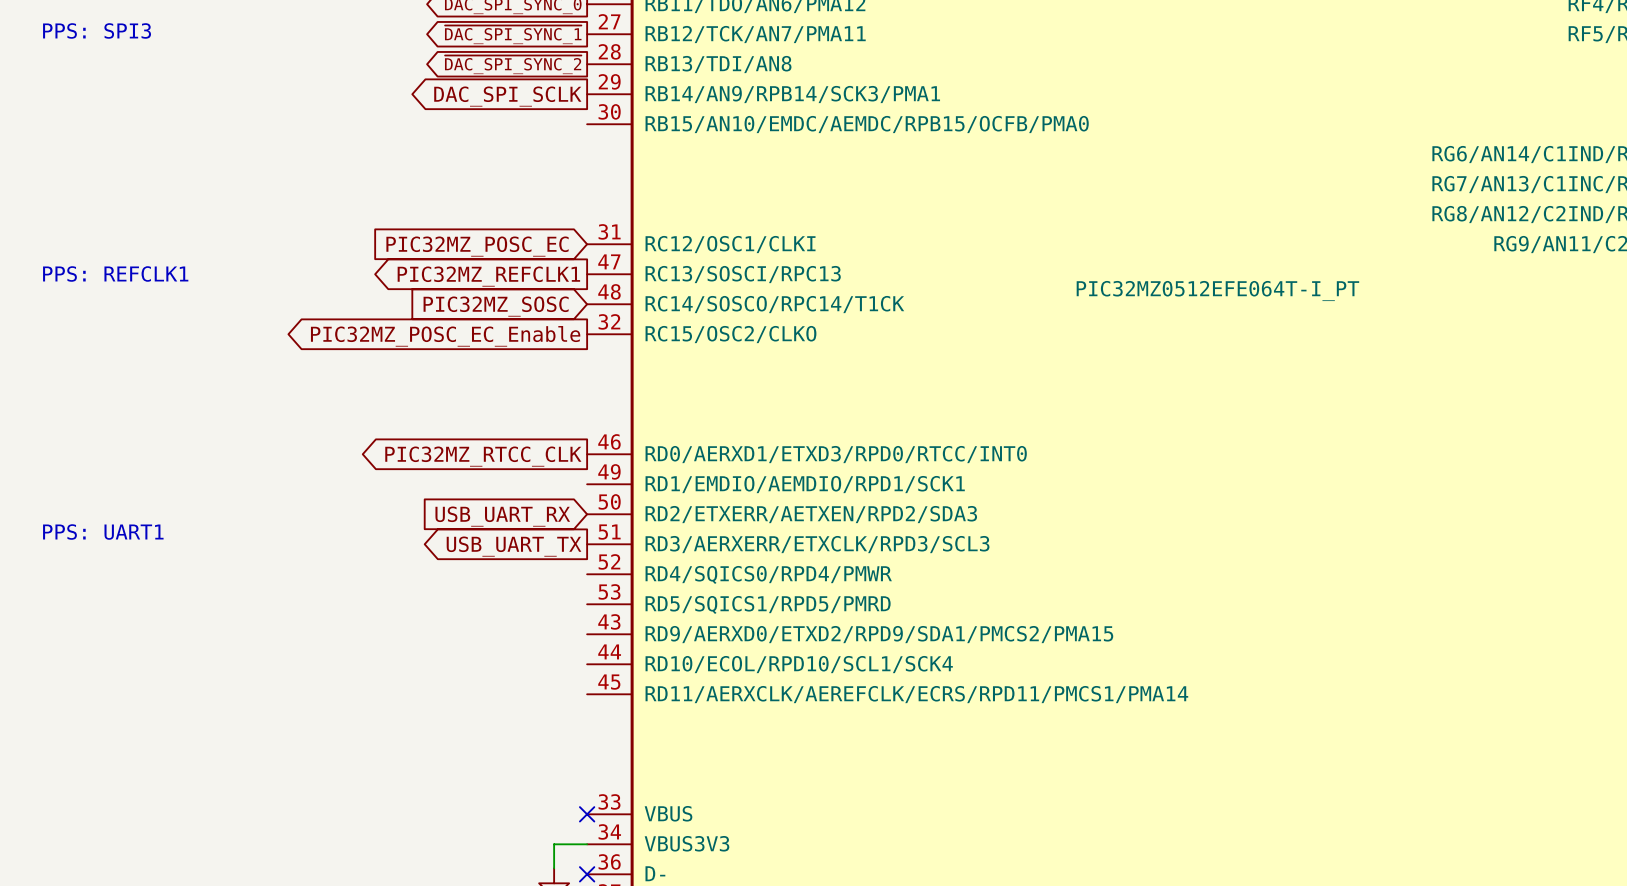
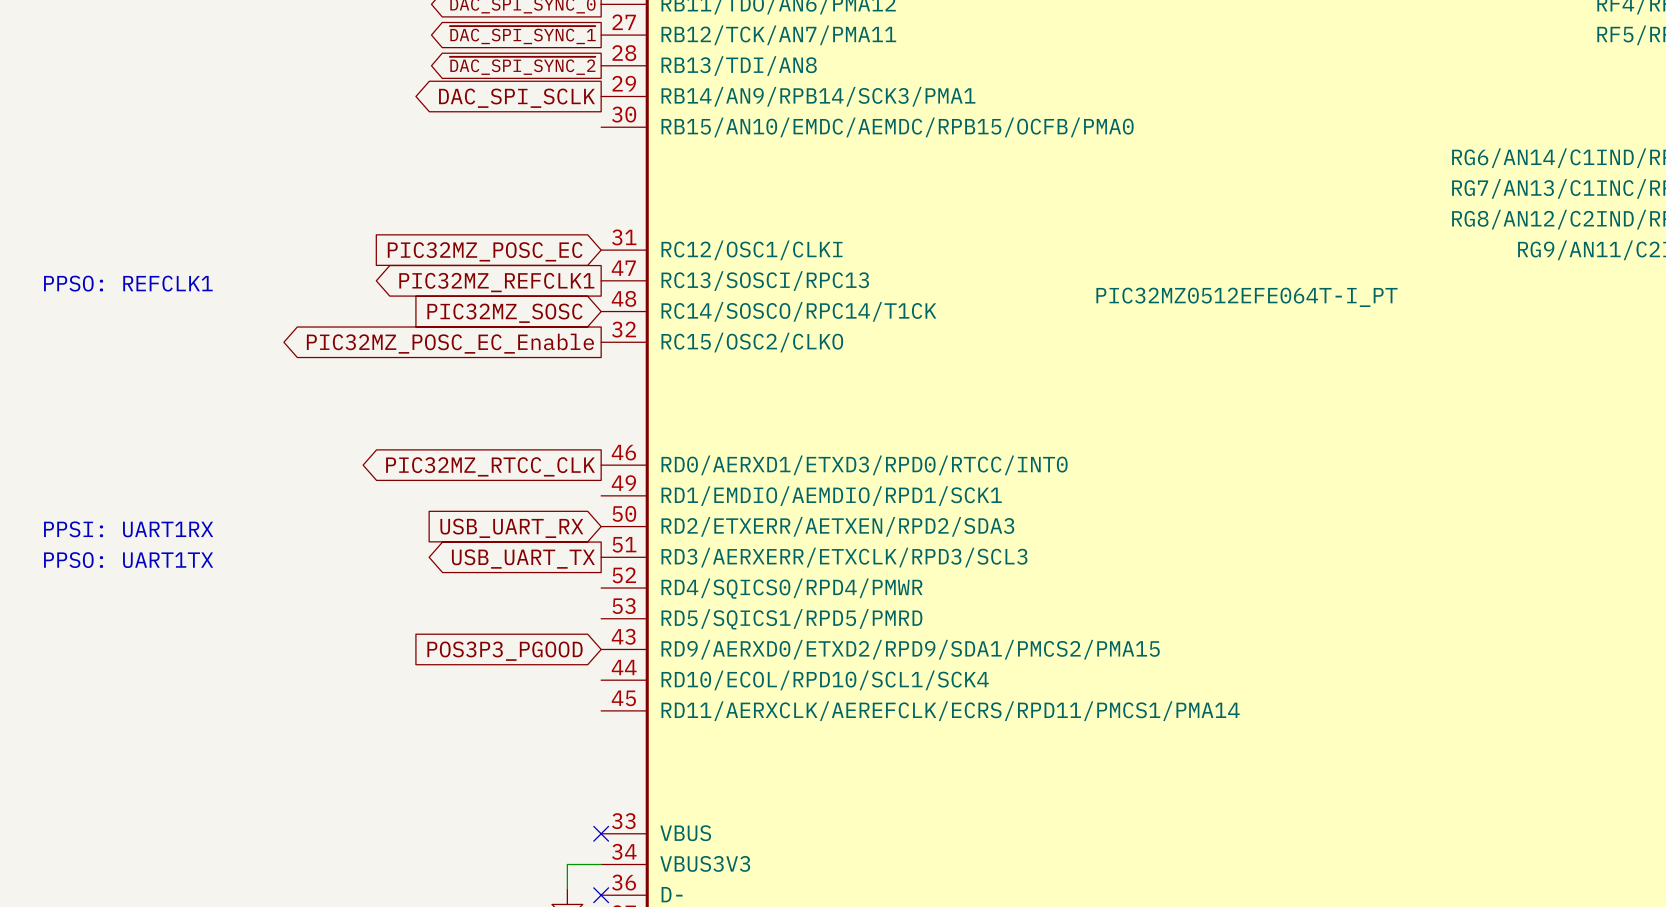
text: PPS: SPI3 (97, 30) -> none
text: PPS: REFCLK1 (115, 273) -> PPSO: REFCLK1 (128, 283)
text: none -> PPSI: UART1RX (128, 529)
text: PPS: UART1 (103, 532) -> none
text: none -> PPSO: UART1TX (128, 560)
global label: none -> POS3P3_PGOOD (505, 651)

